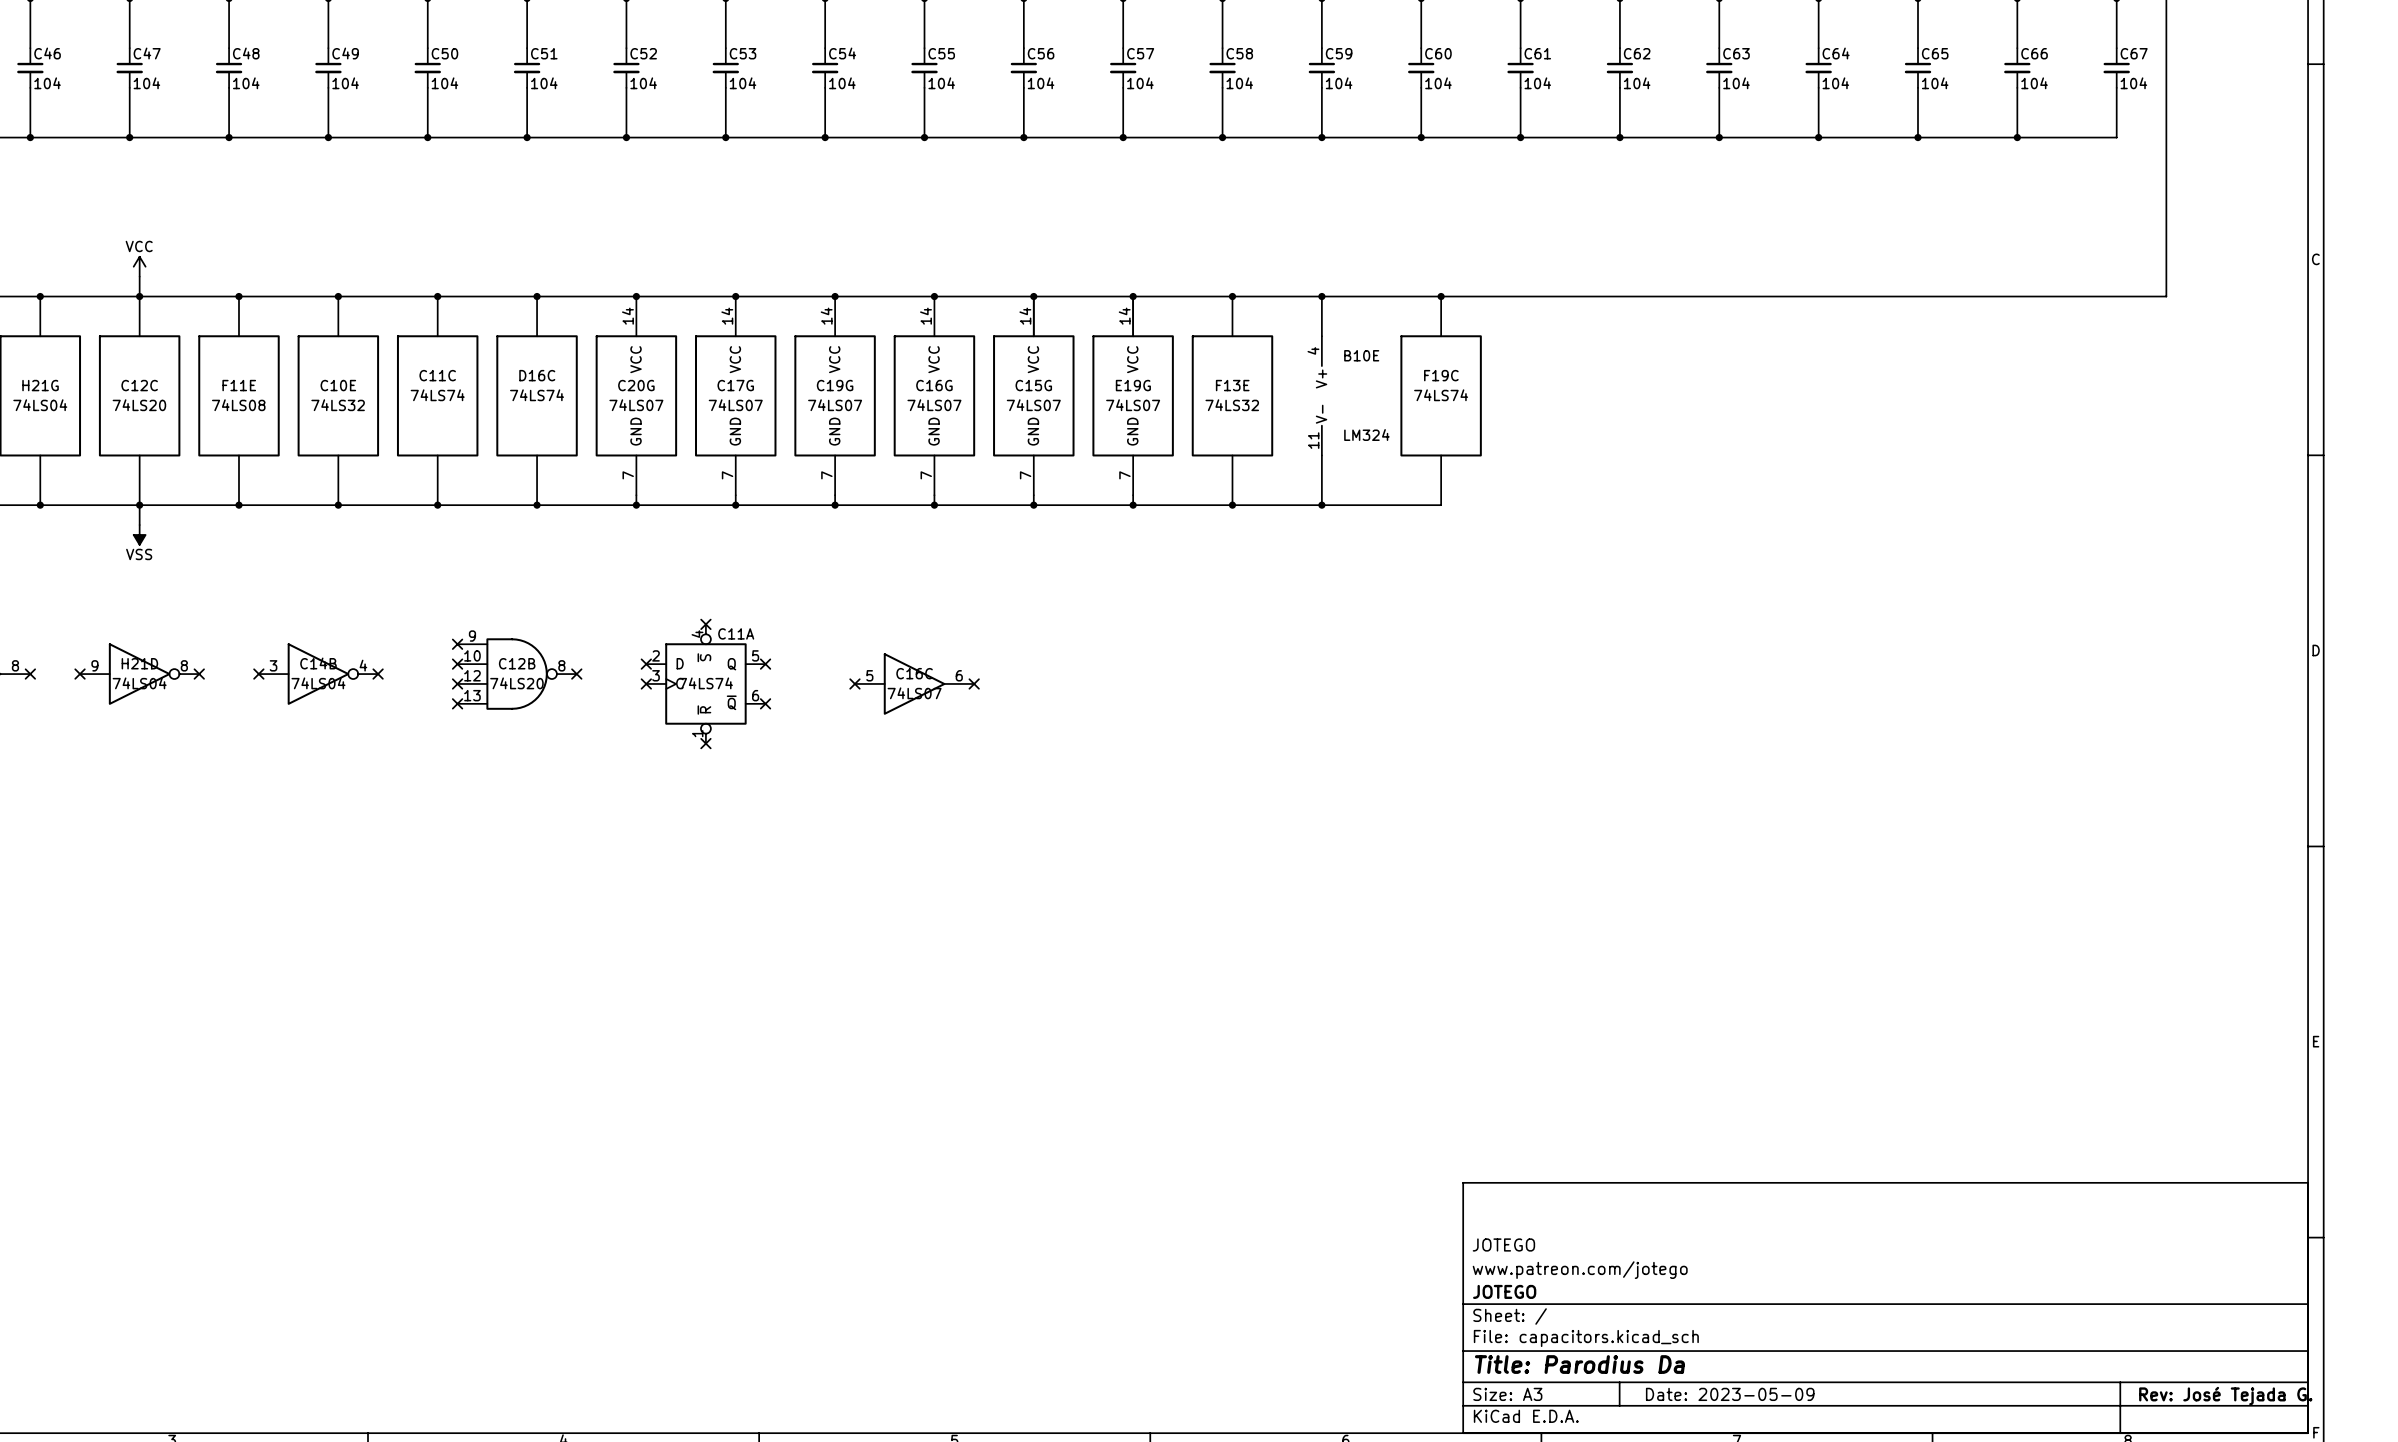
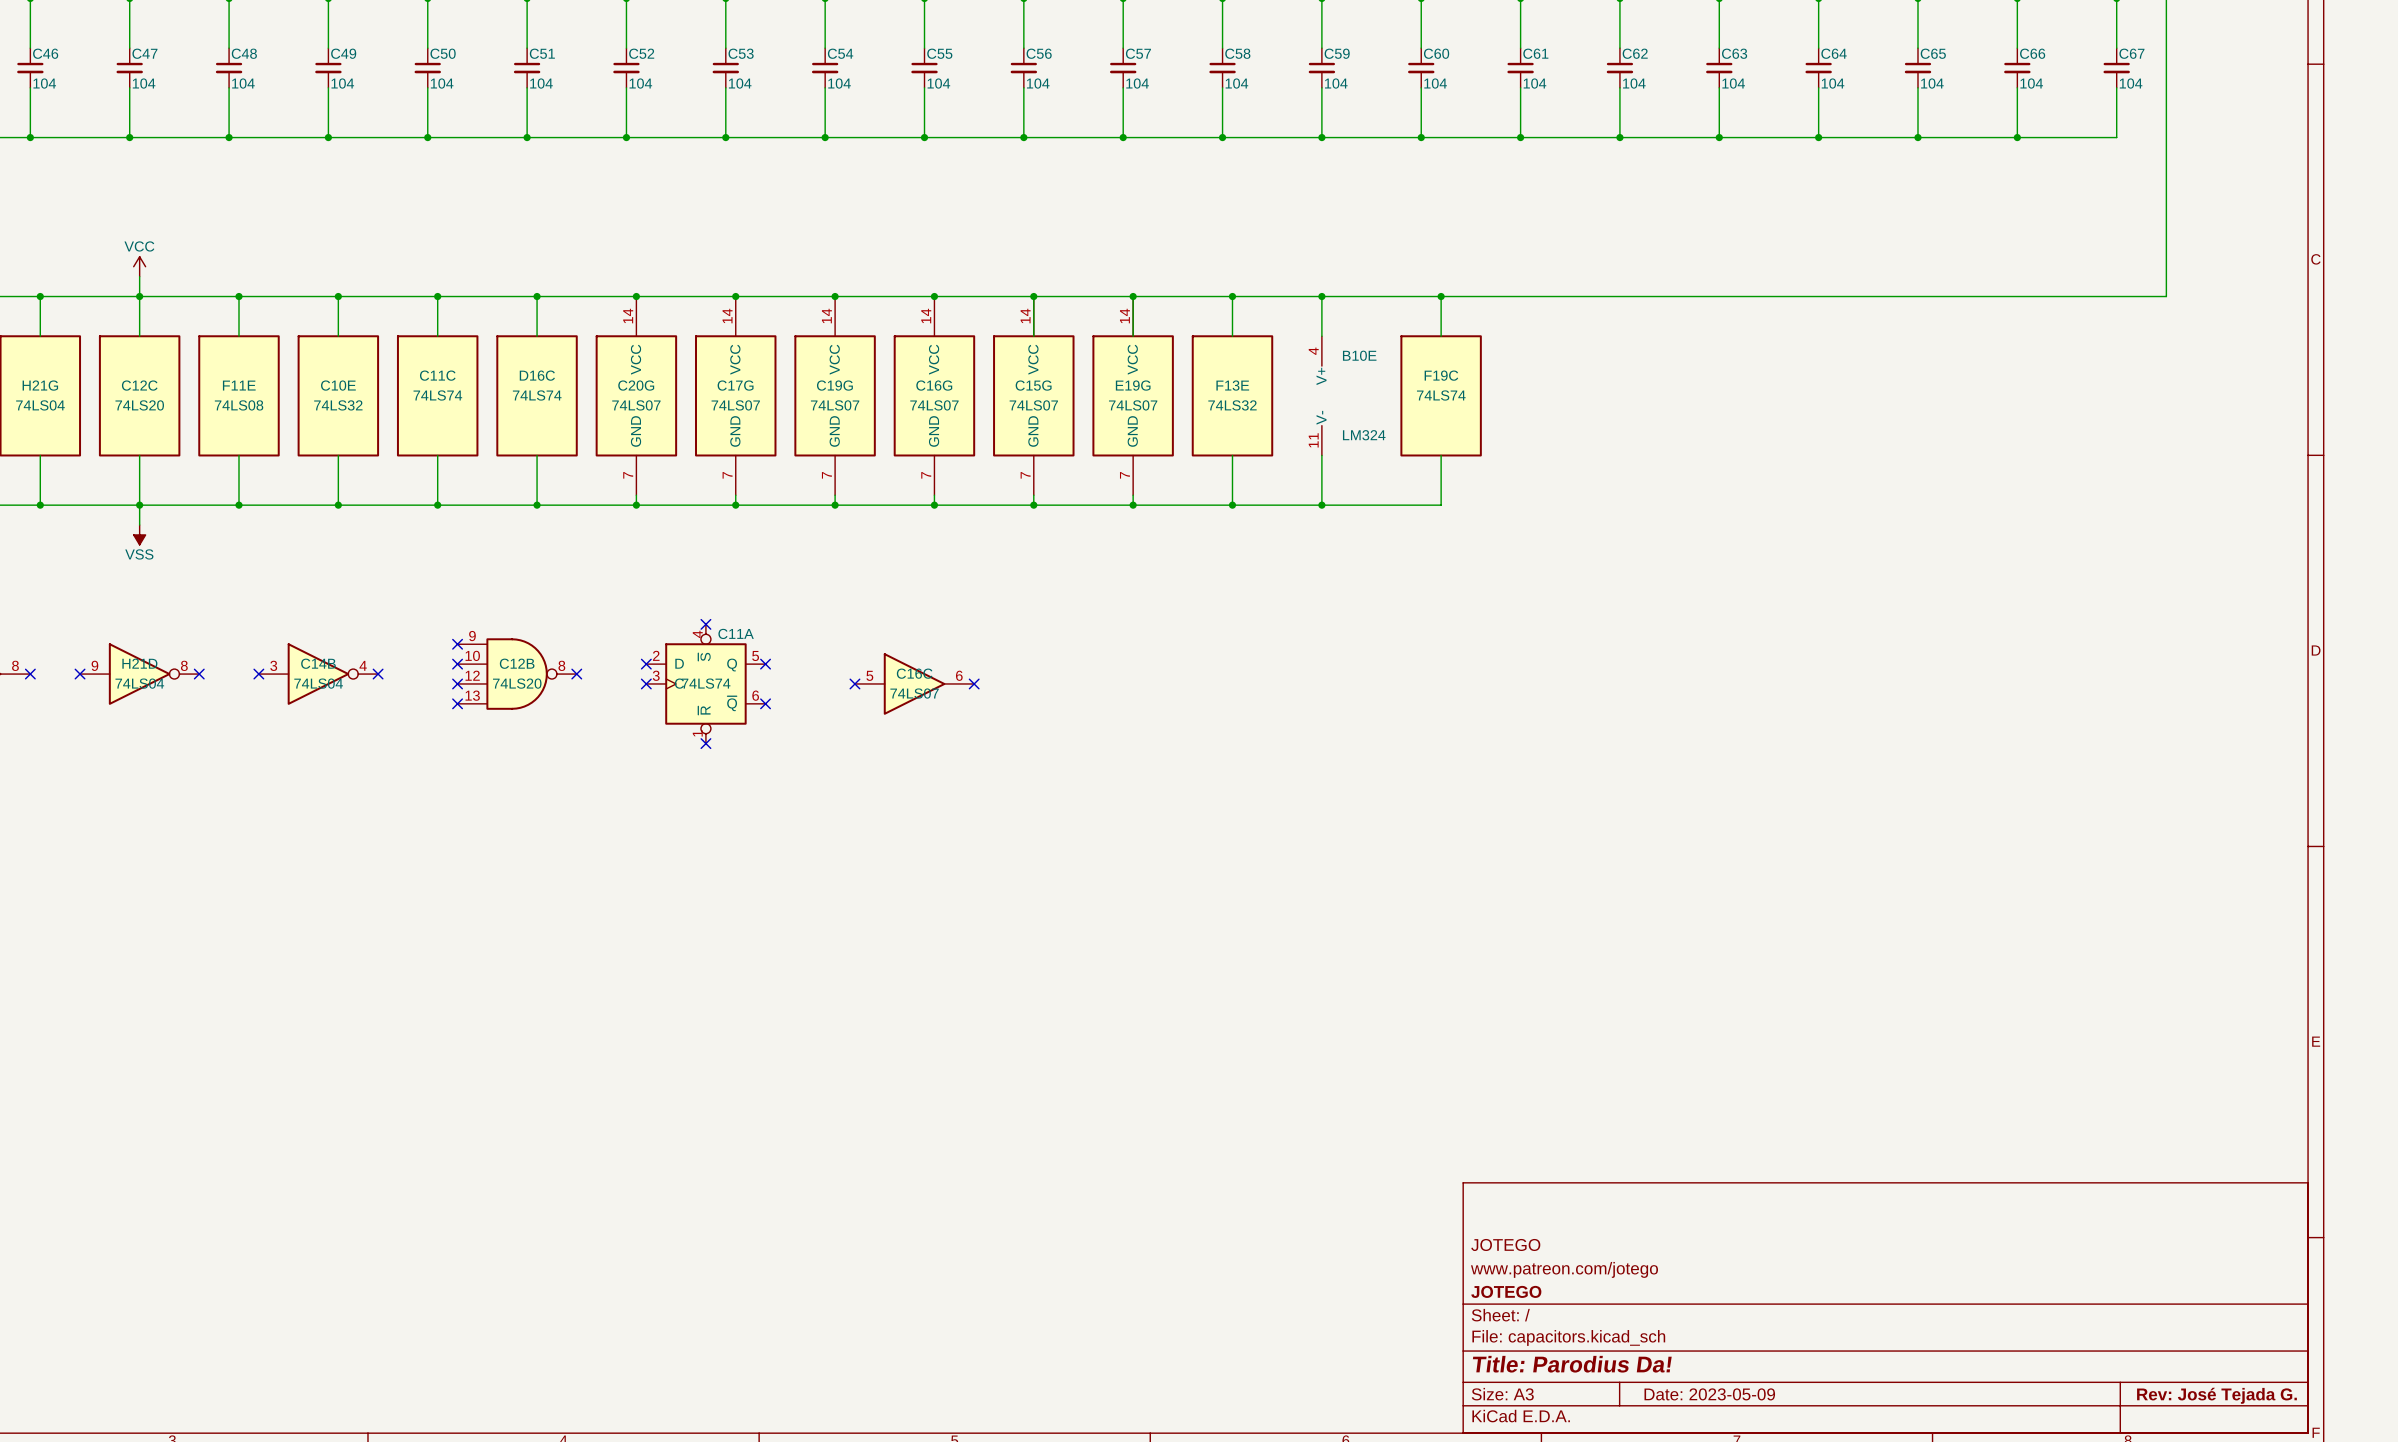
title block: Title: Parodius Da (1579, 1364) -> Title: Parodius Da! (1572, 1364)

